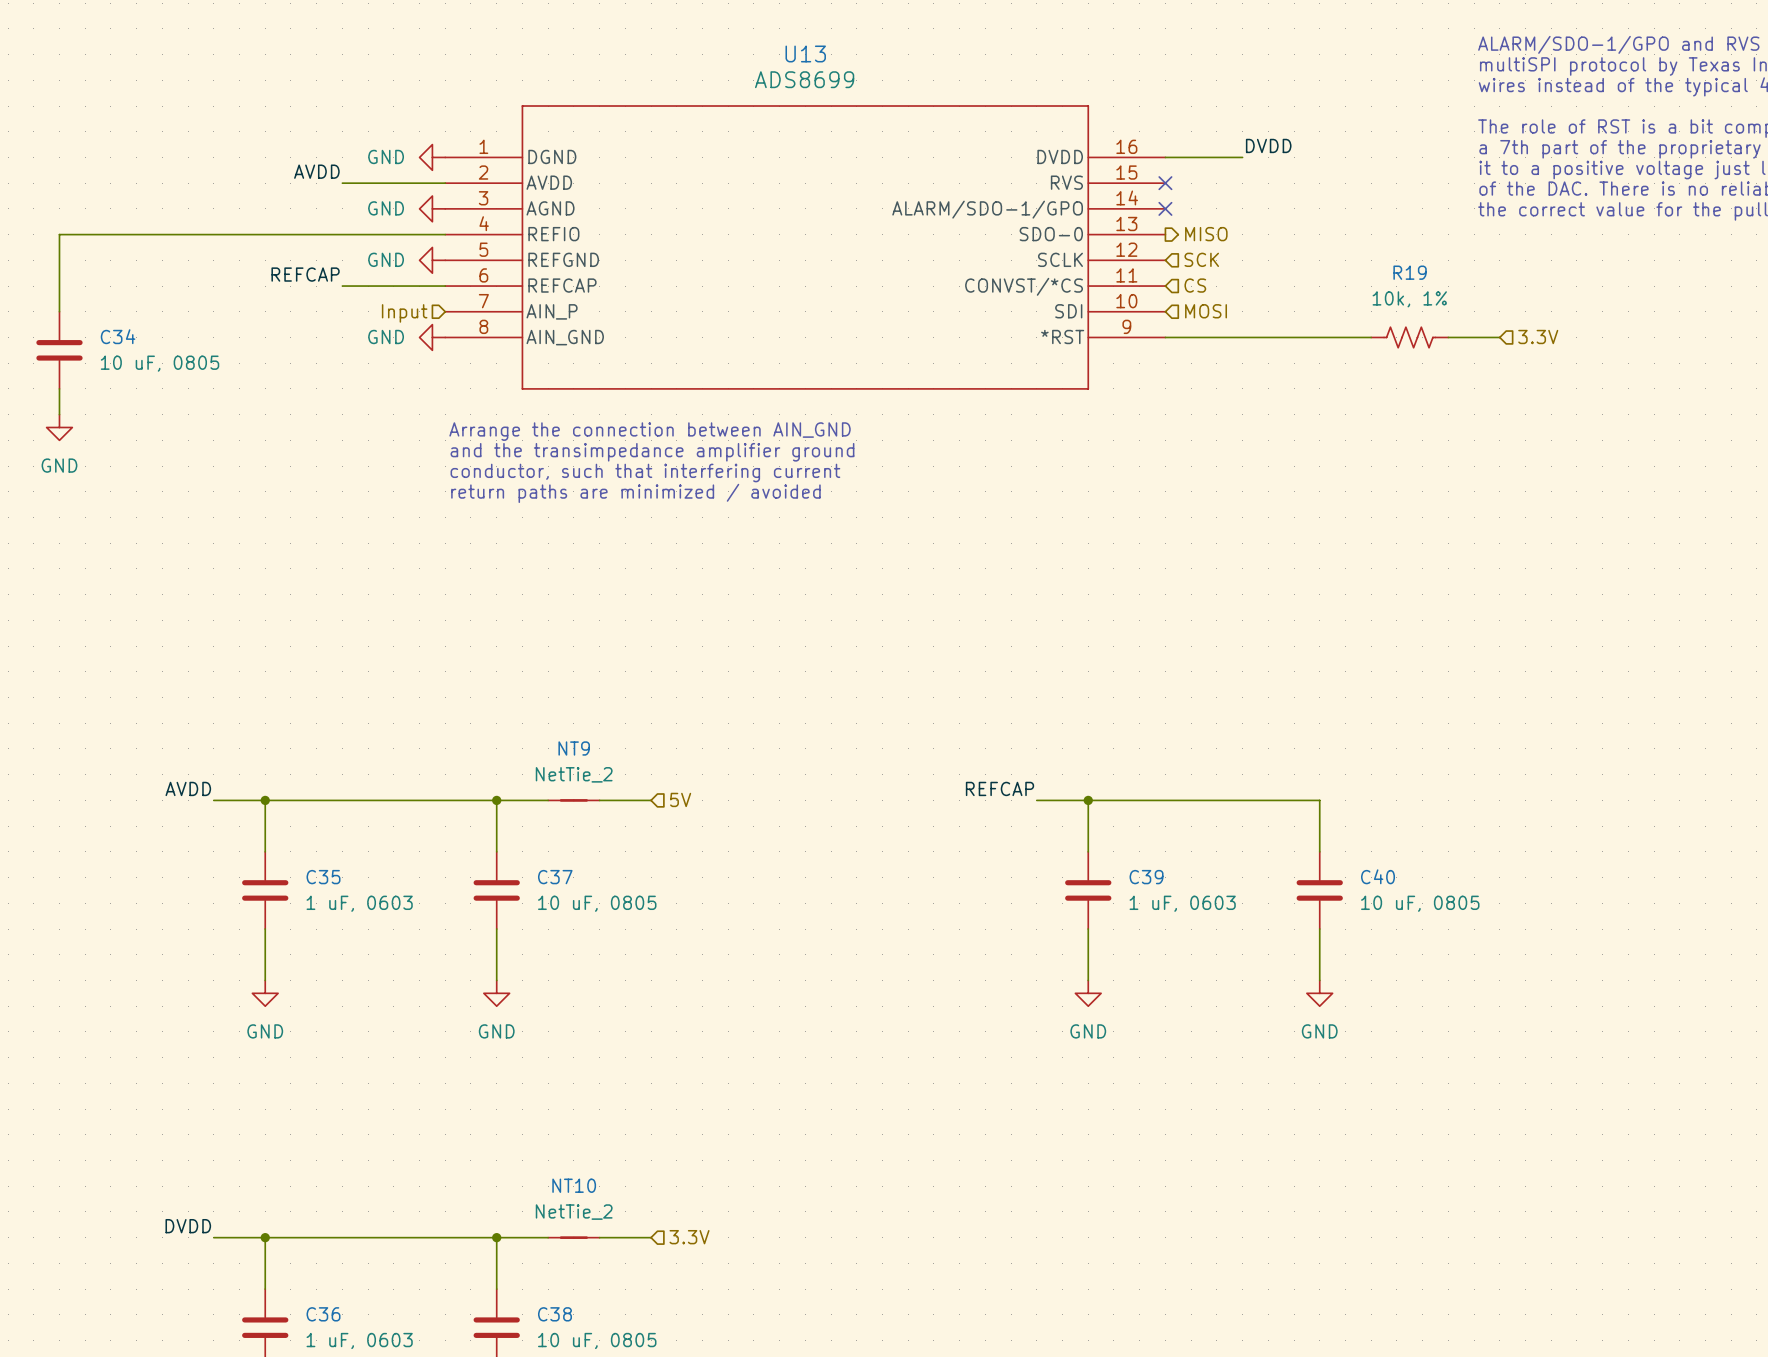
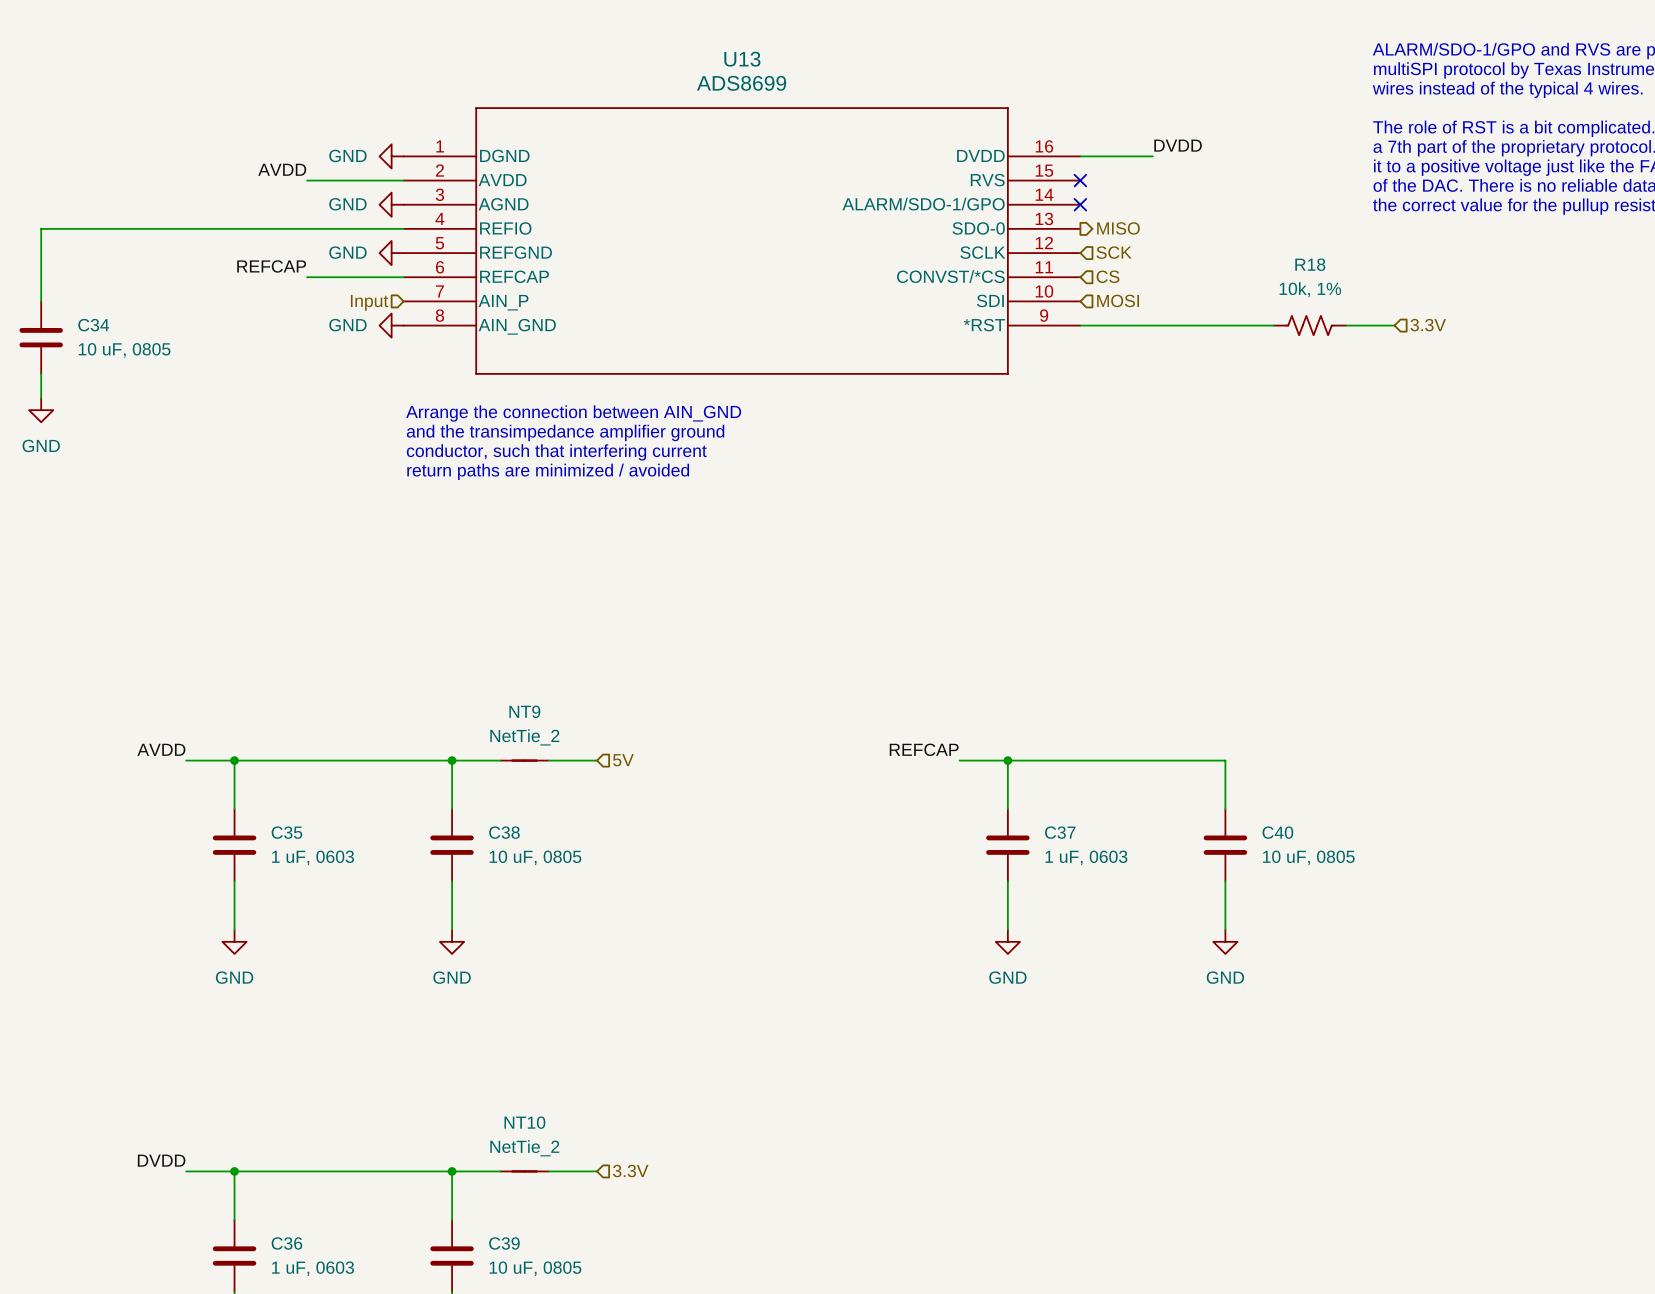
R19 name: R19 (1410, 272) -> R18 (1310, 264)
C37 name: C37 (555, 877) -> C38 (504, 832)
C39 name: C39 (1146, 877) -> C37 (1060, 832)
C38 name: C38 (554, 1314) -> C39 (504, 1243)

